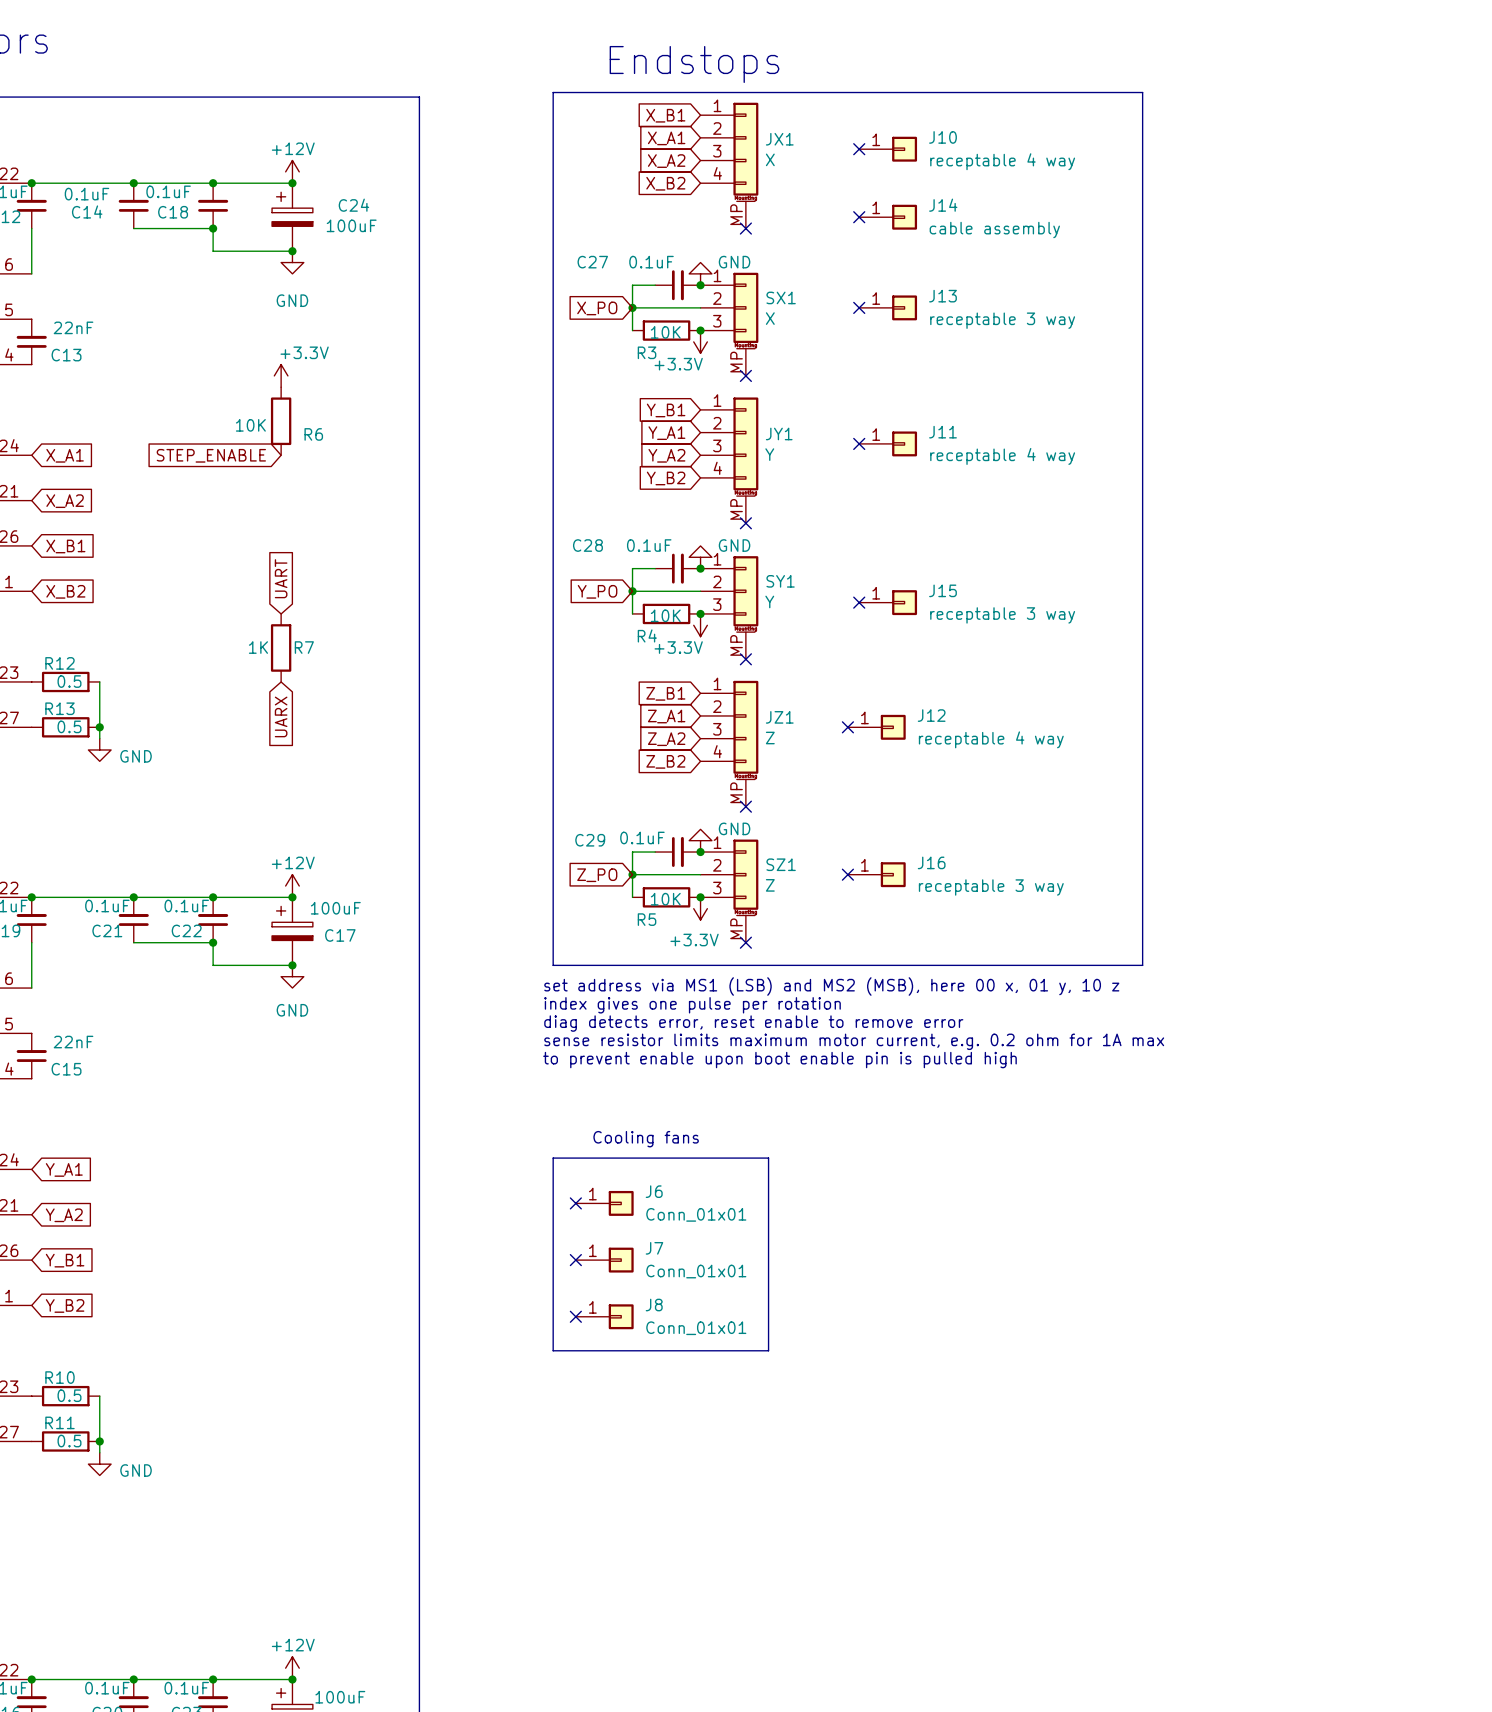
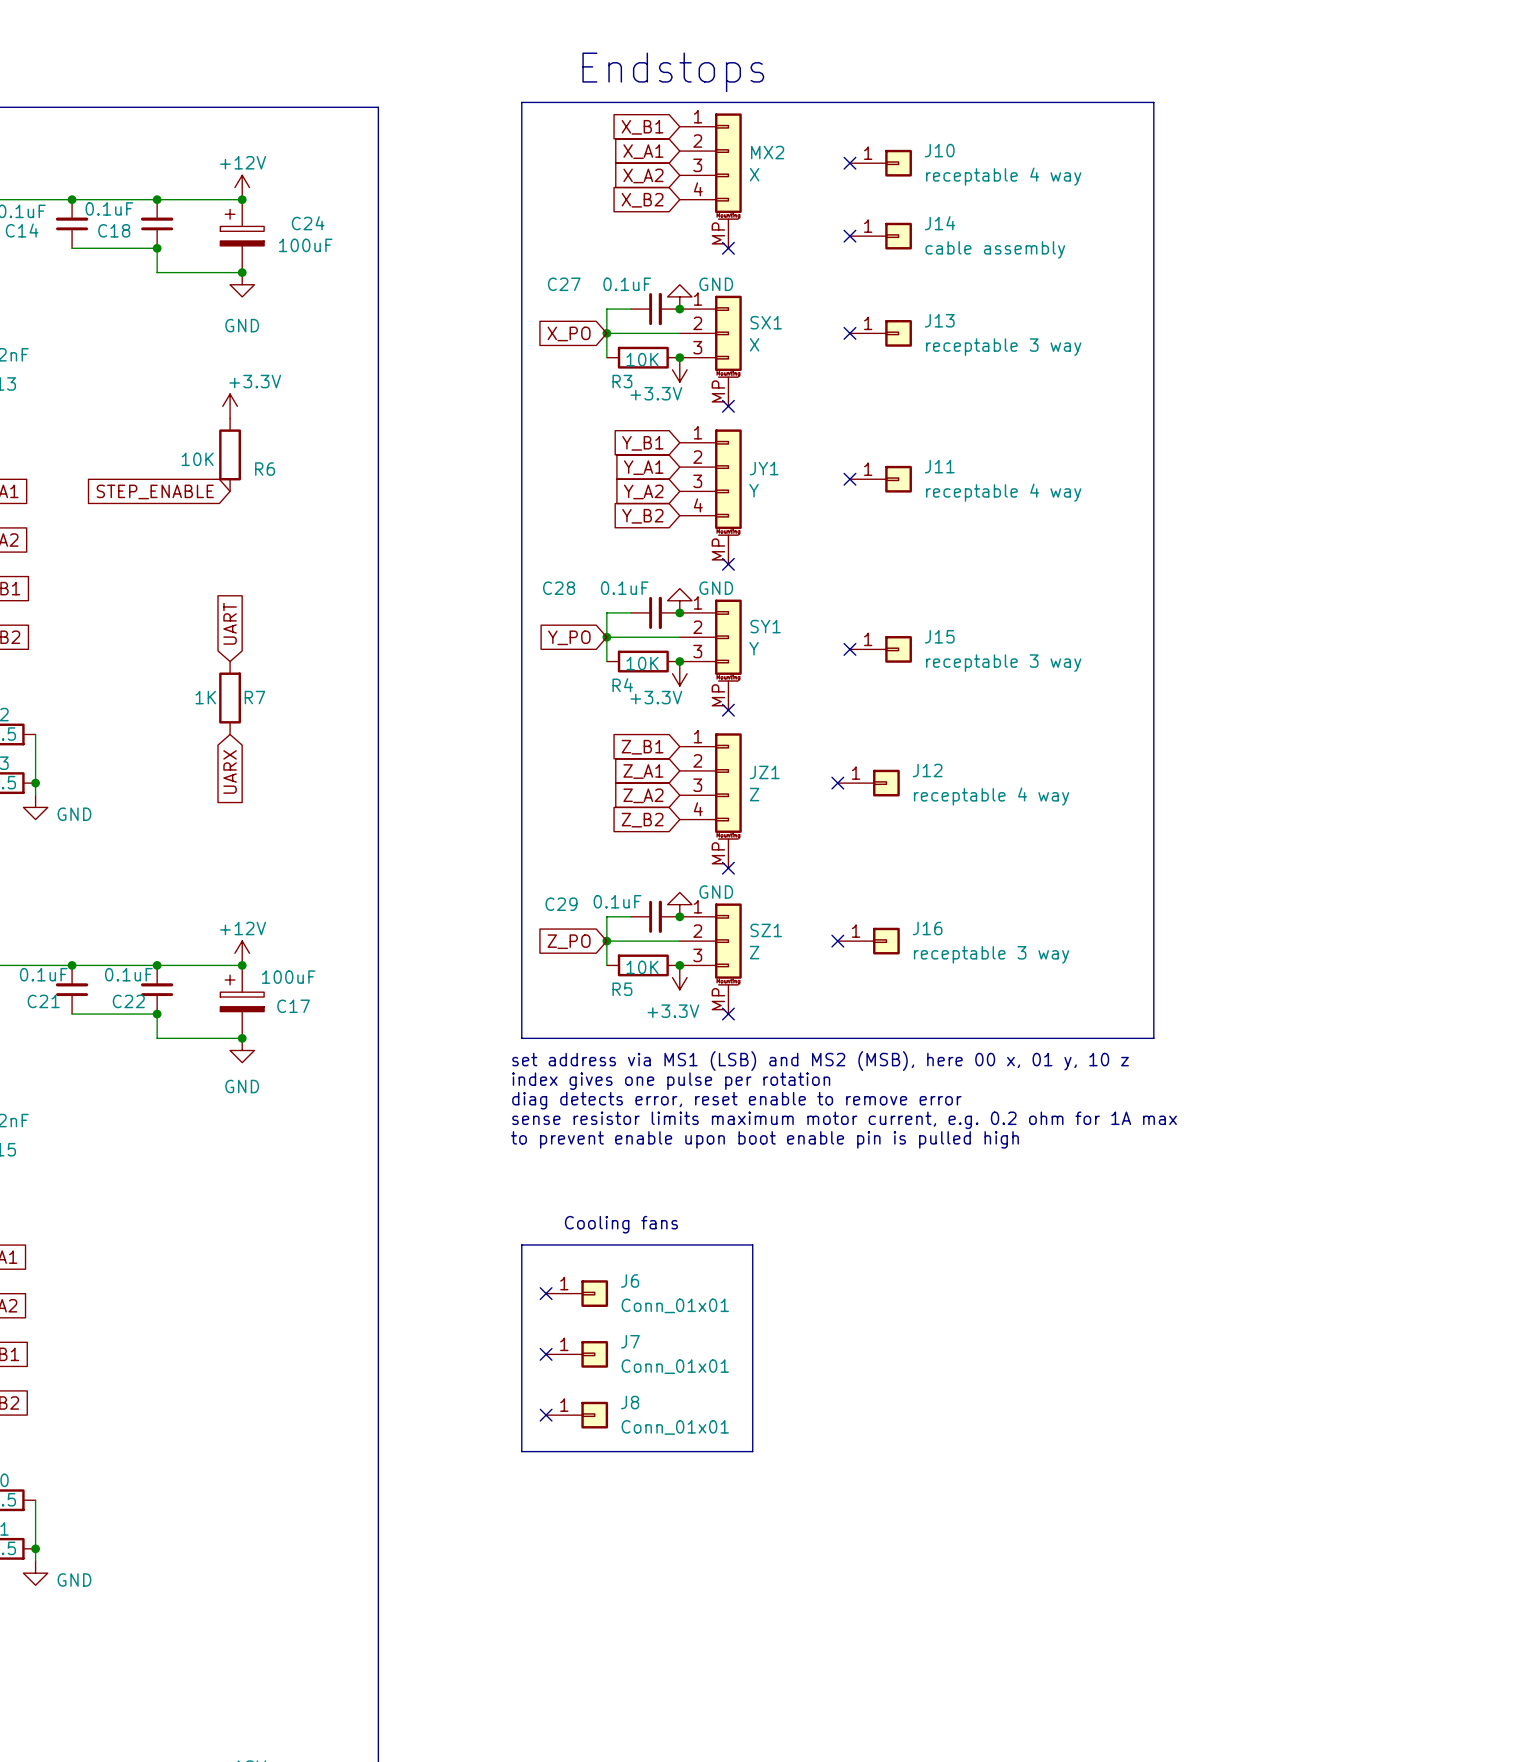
JX1 name: JX1 (779, 139) -> MX2 (767, 152)

